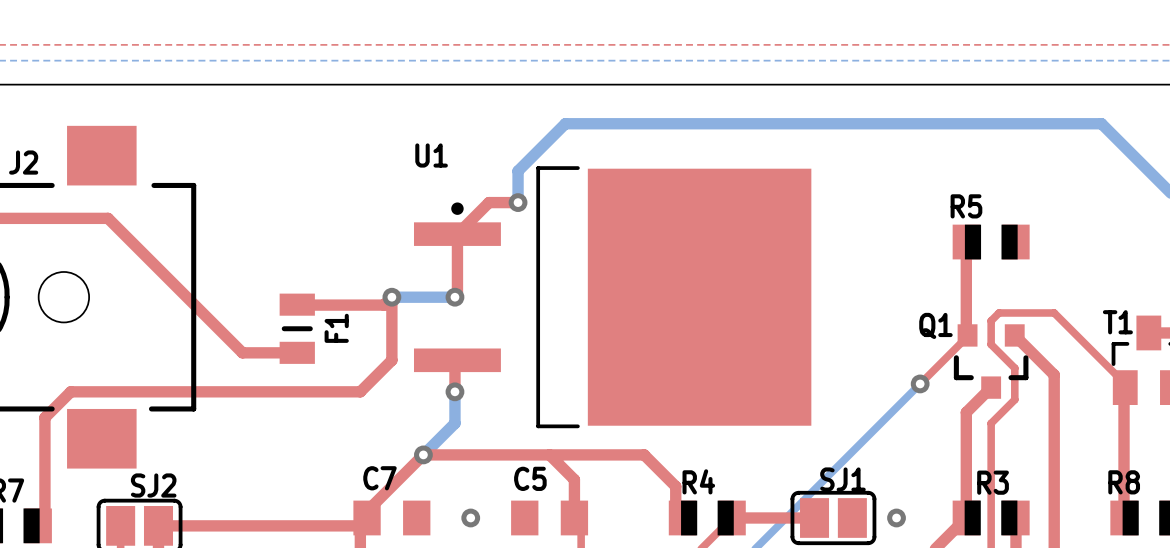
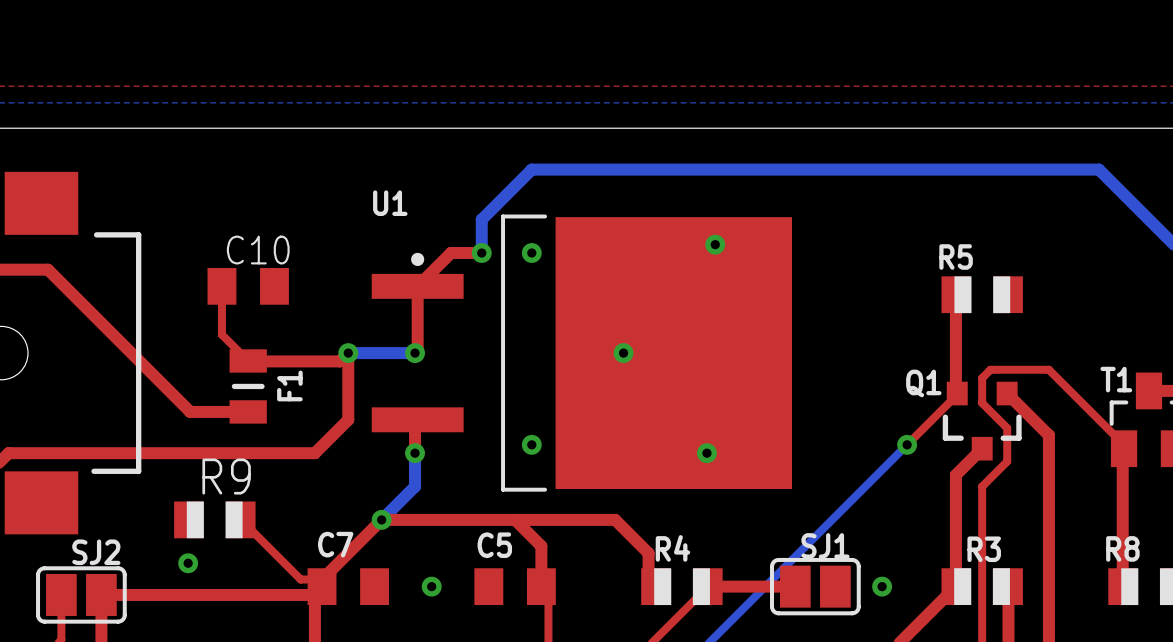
via: none -> (715, 244)
via: none -> (531, 253)
top track: none -> (221, 286) (221, 334) (248, 360)
C10: none -> (248, 286)
via: none -> (623, 353)
via: none -> (531, 444)
via: none -> (706, 453)
R9: none -> (214, 519)
top track: none -> (241, 519) (300, 579) (322, 579)
via: none -> (188, 563)

